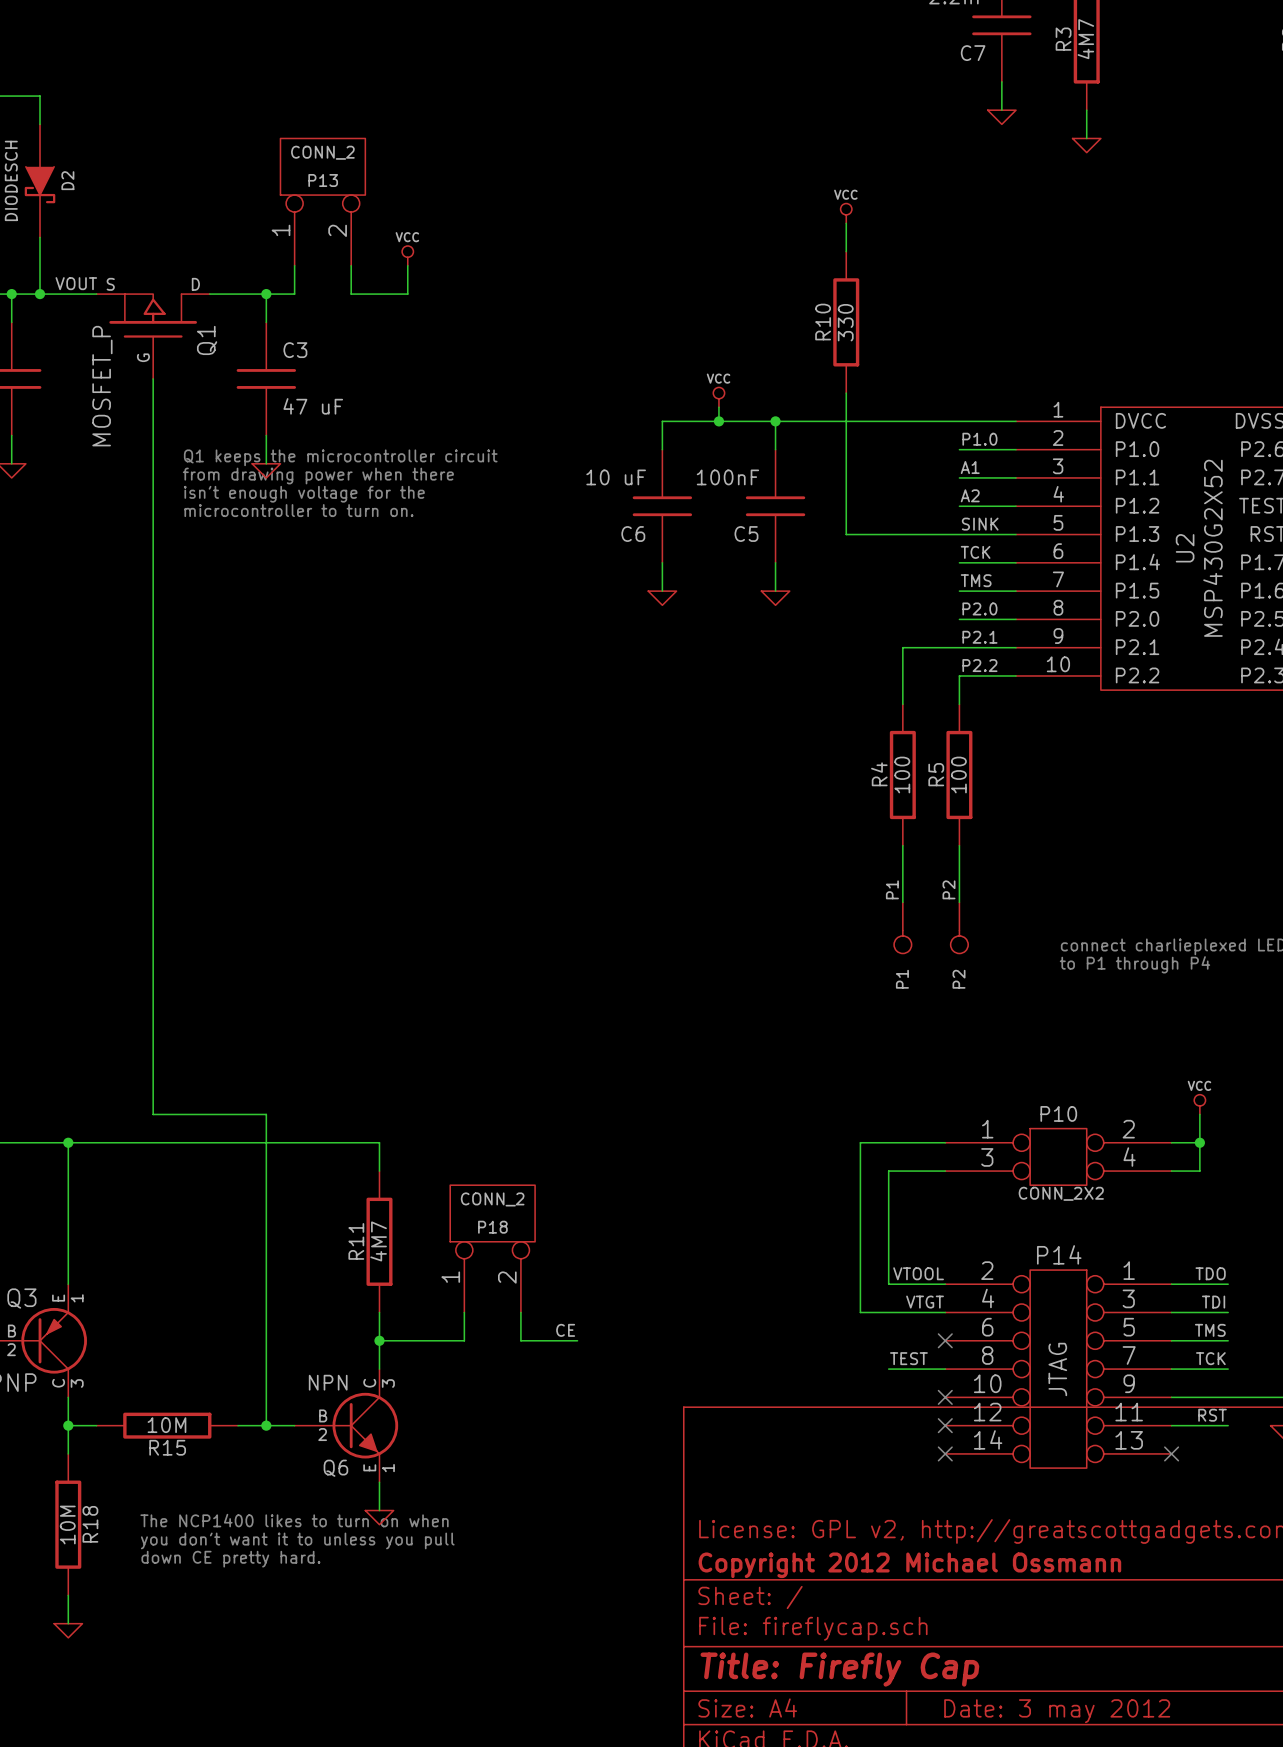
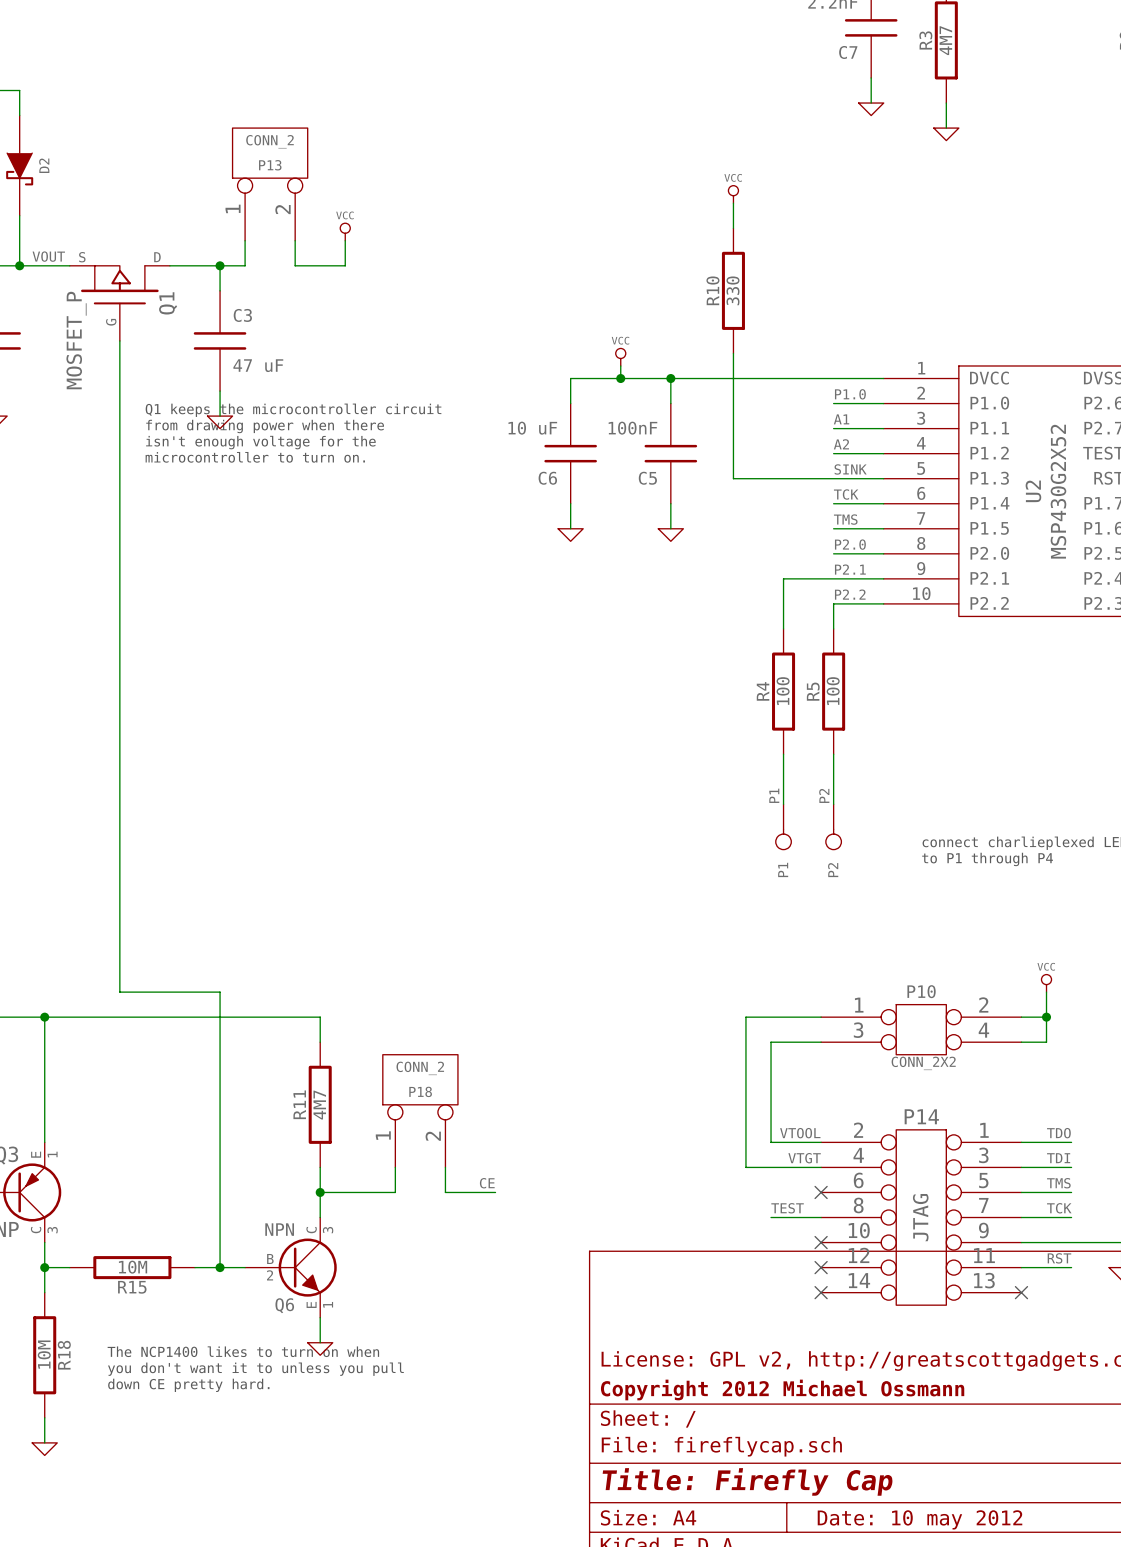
title block: Date: 3 may 2012 (1057, 1711) -> Date: 10 may 2012 (920, 1519)

